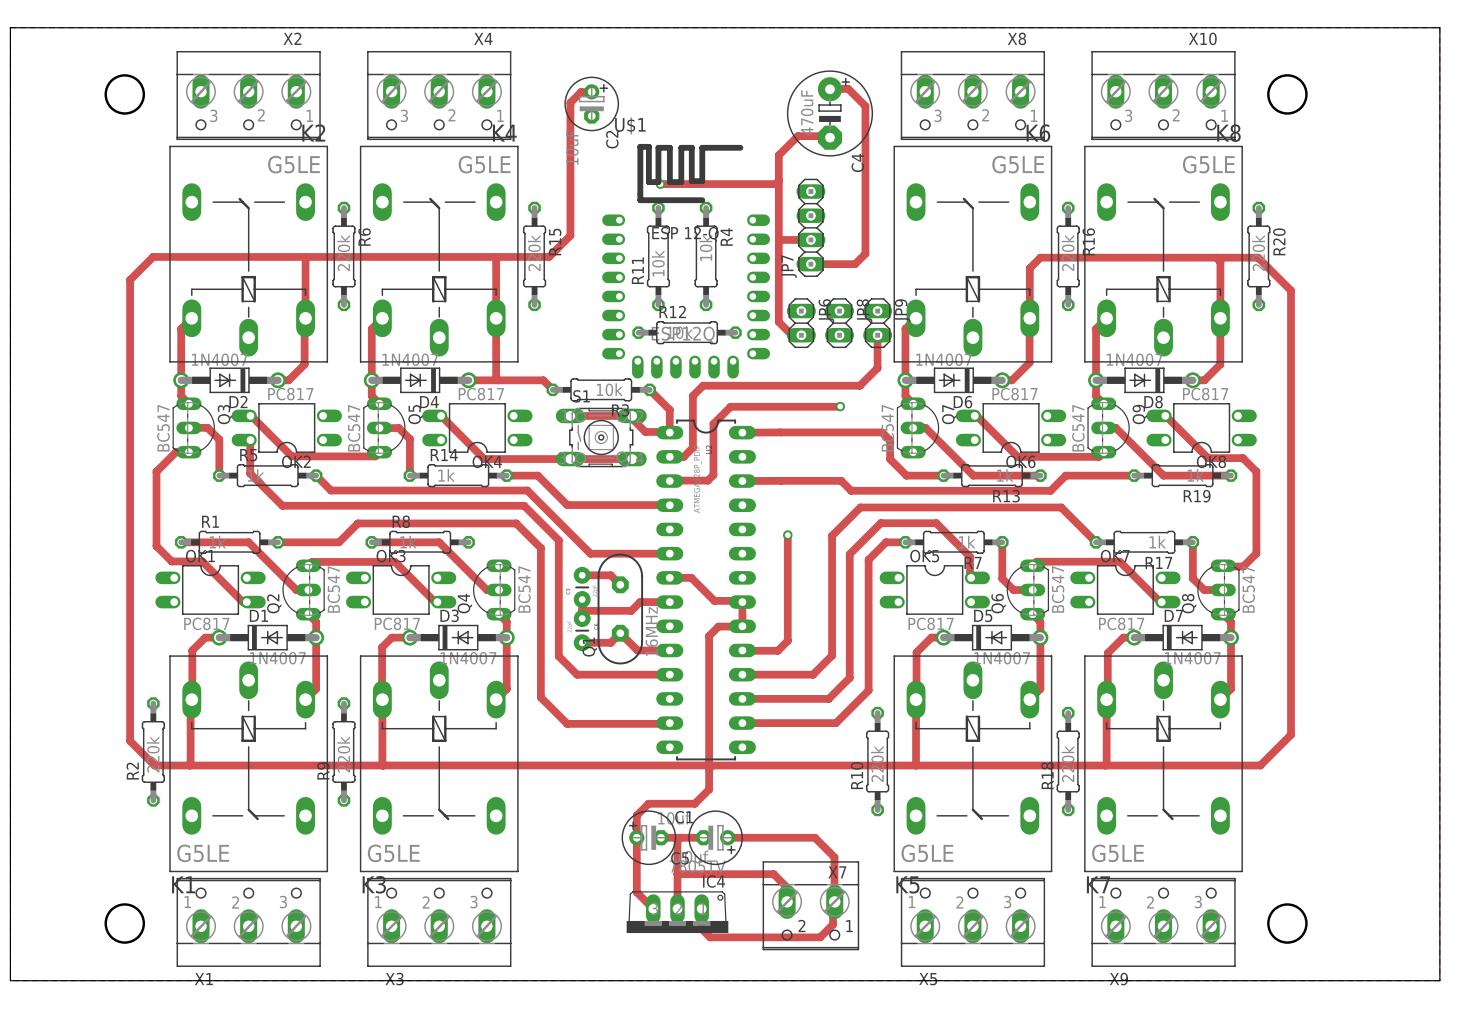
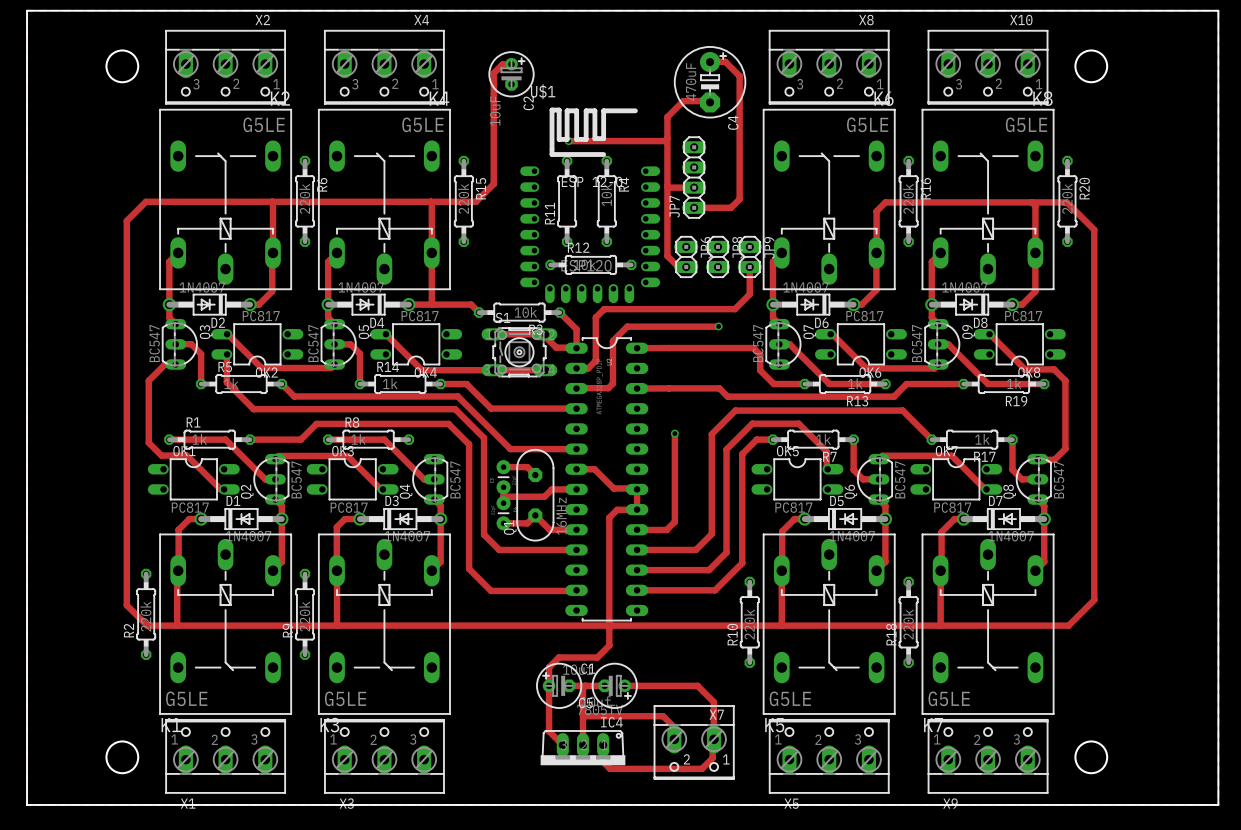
R11 value: 10k (658, 263) -> none

